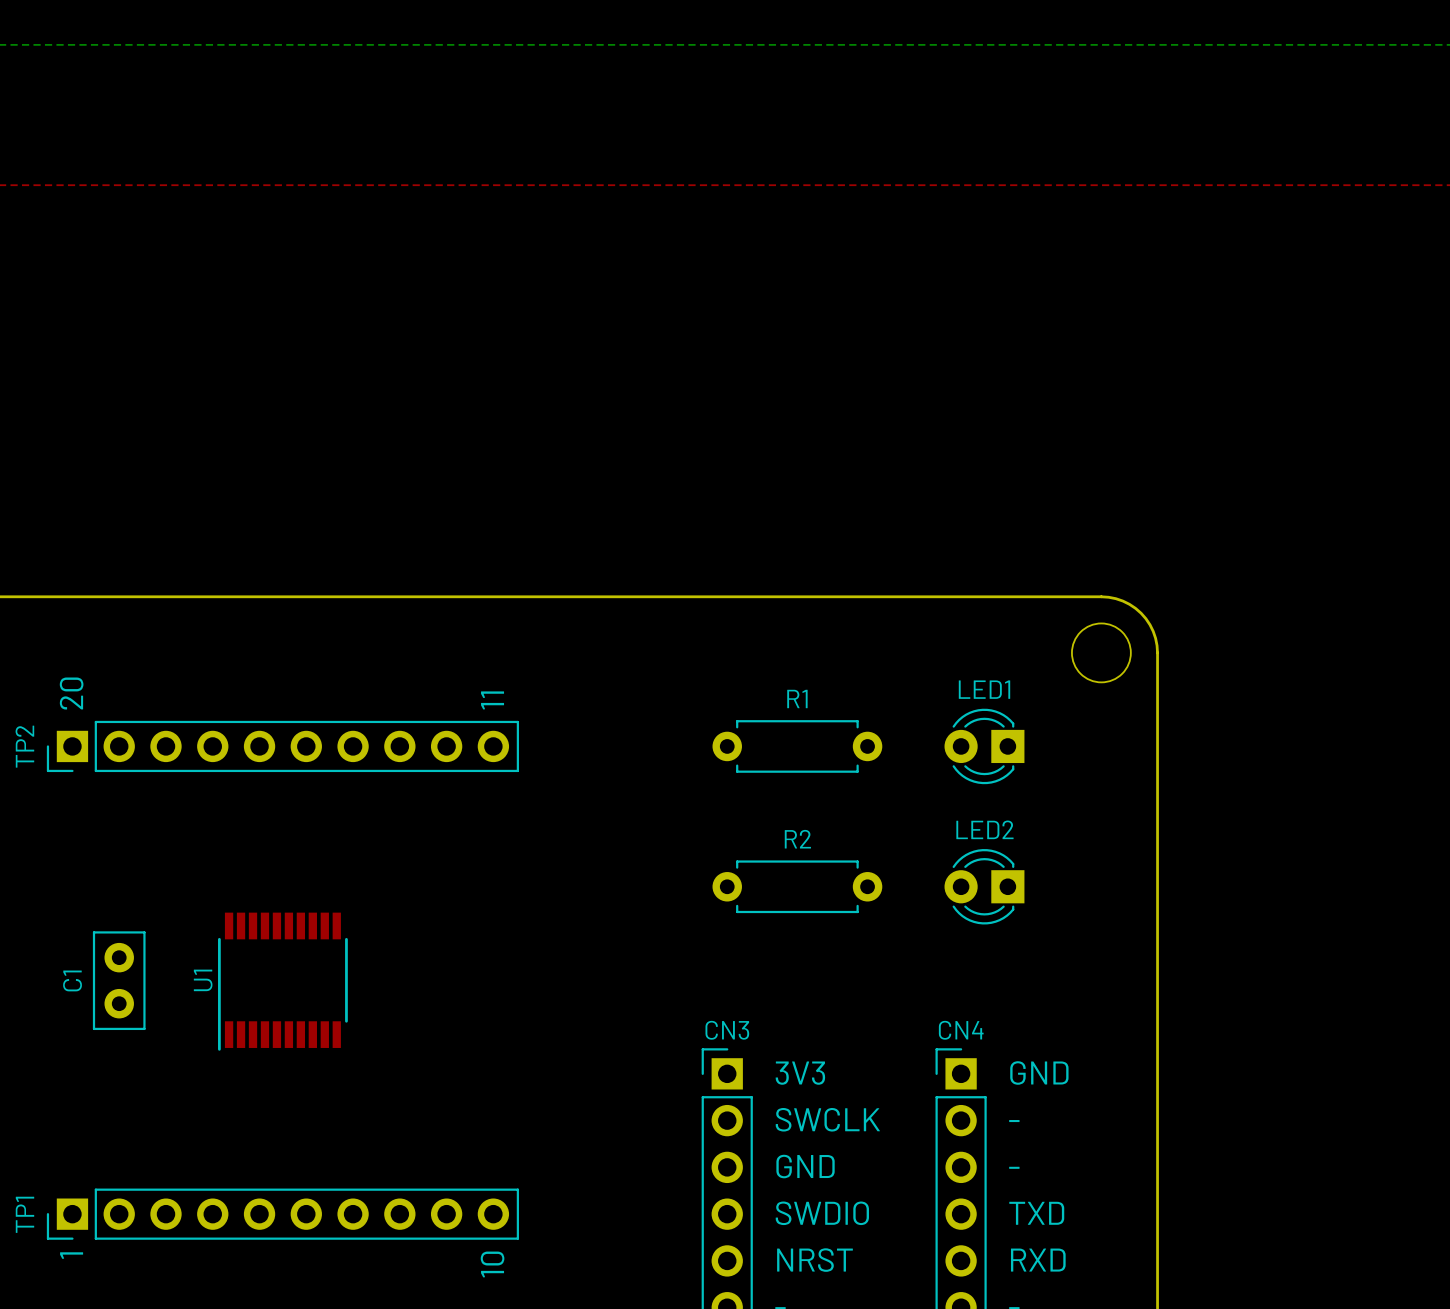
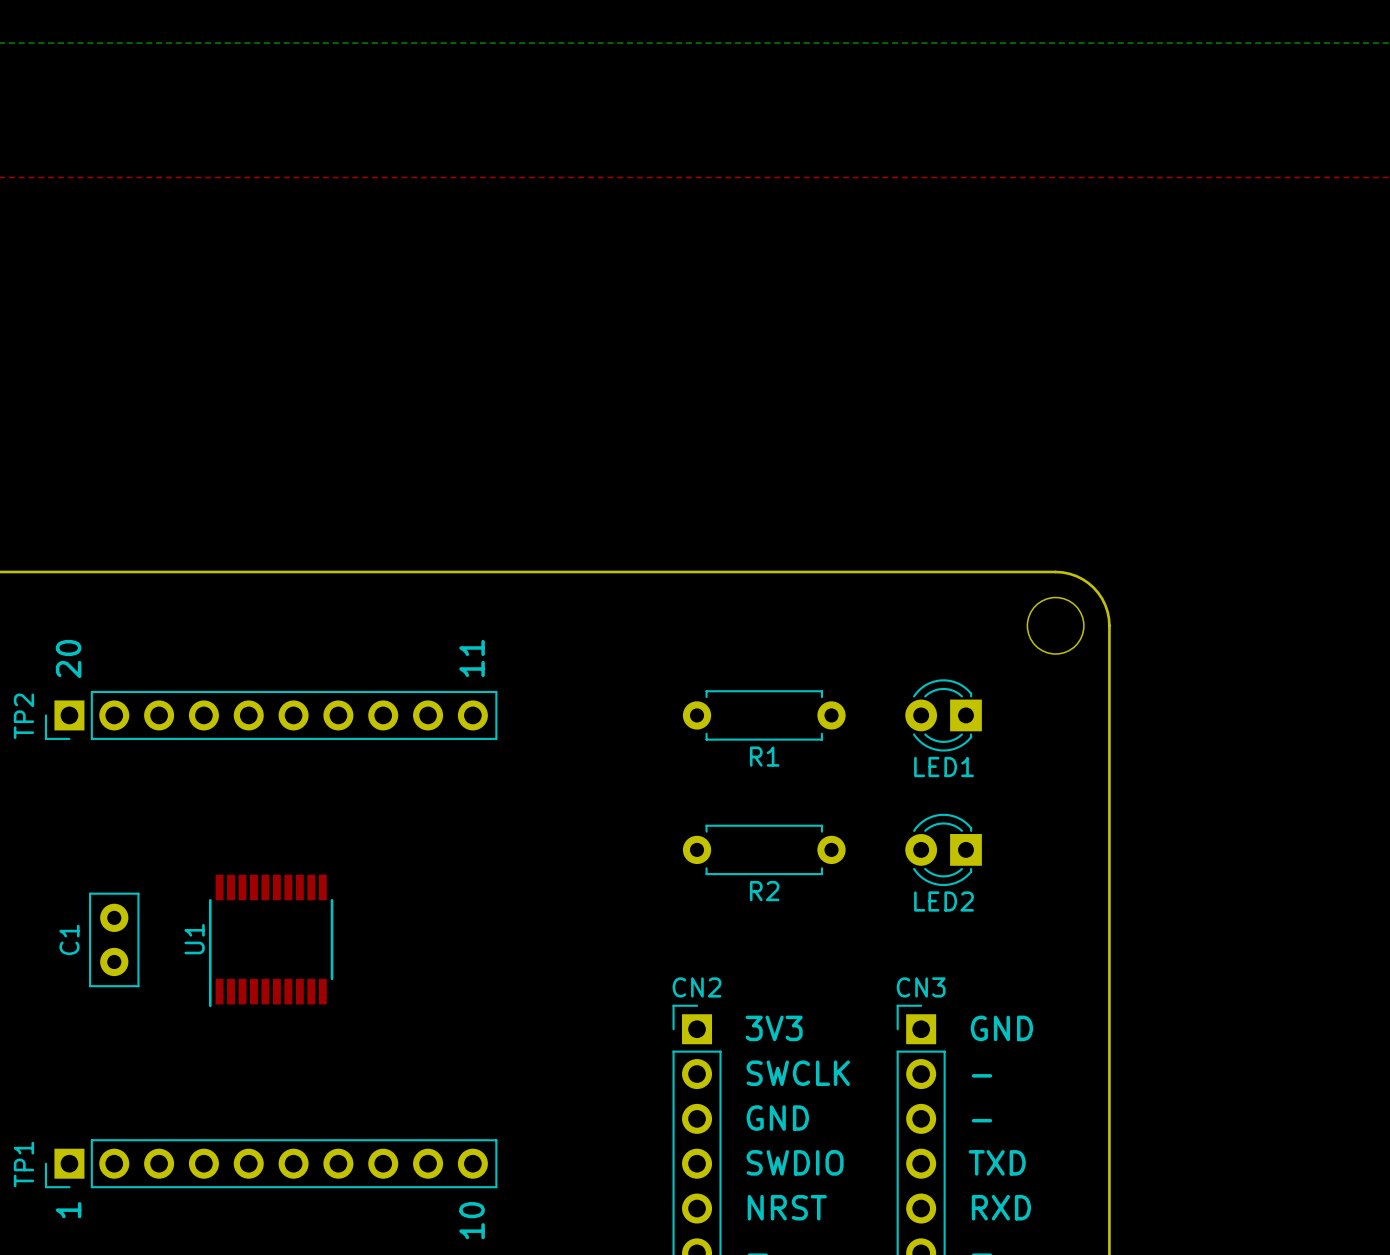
LED1 name position: LED1 (984, 689) -> LED1 (943, 767)
R1 name position: R1 (797, 698) -> R1 (764, 756)
LED2 name position: LED2 (984, 829) -> LED2 (943, 901)
R2 name position: R2 (797, 839) -> R2 (764, 891)
CN3 name: CN3 (727, 1030) -> CN2 (697, 987)
CN4 name: CN4 (961, 1030) -> CN3 (921, 987)

